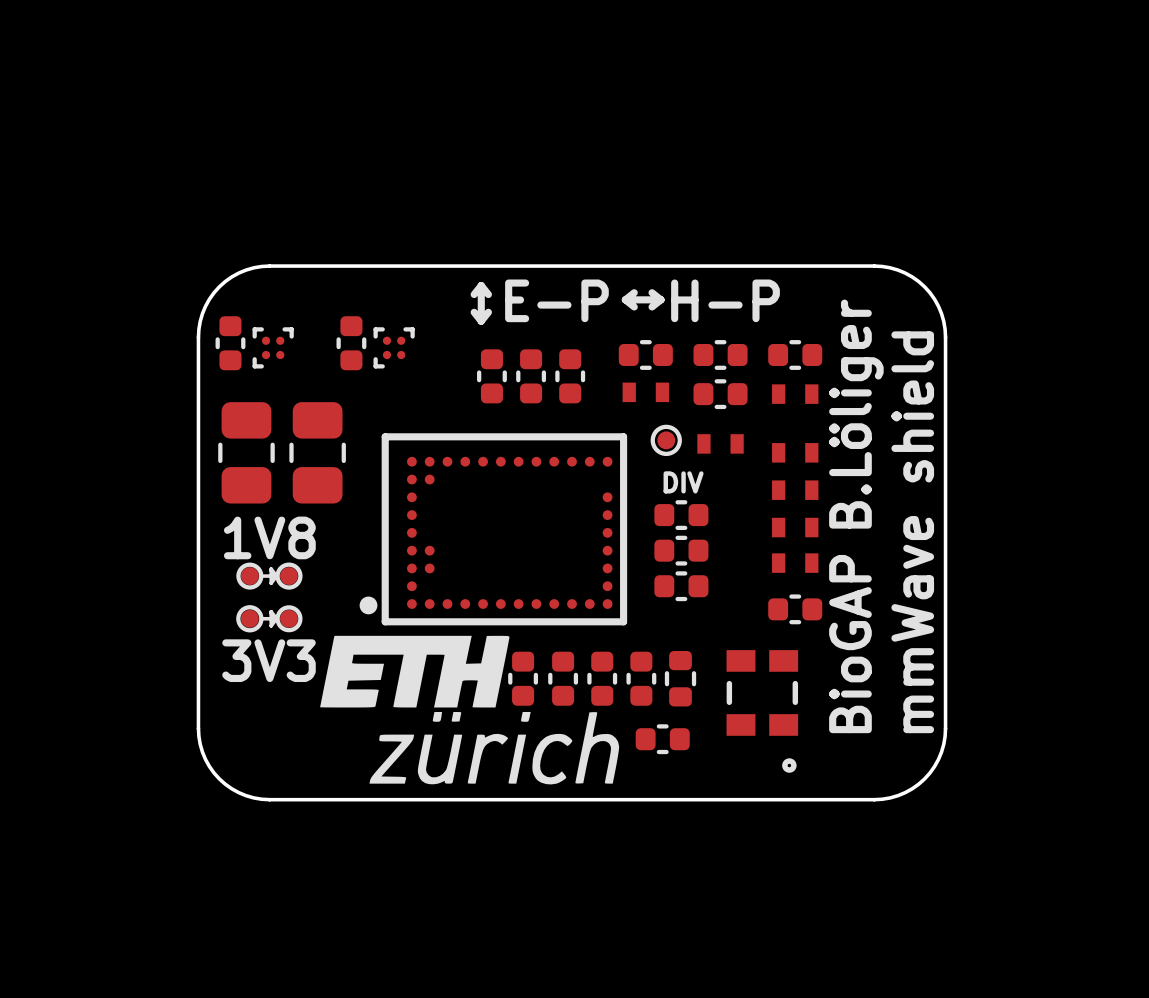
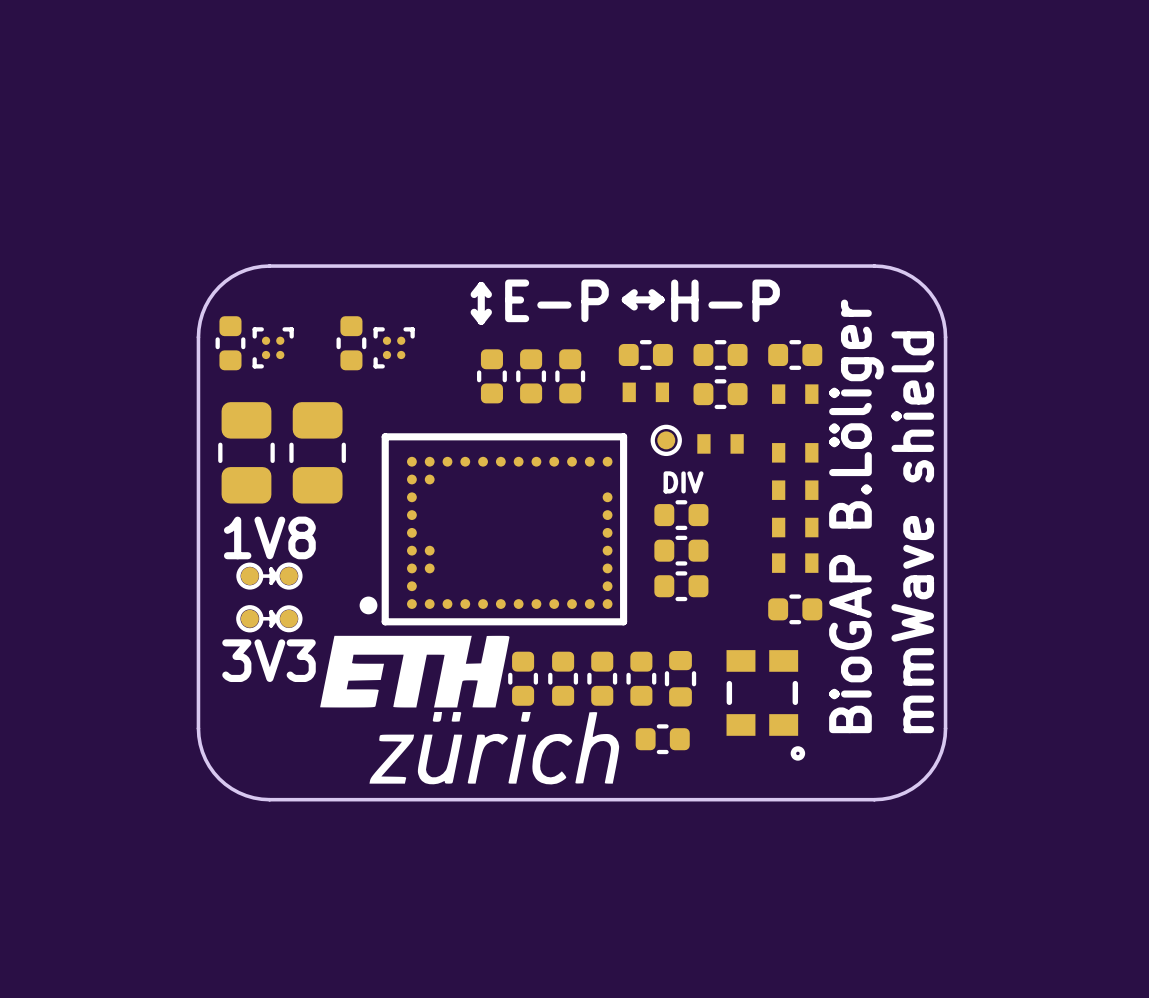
part footprint: [726, 650, 799, 773] -> [726, 650, 806, 761]

